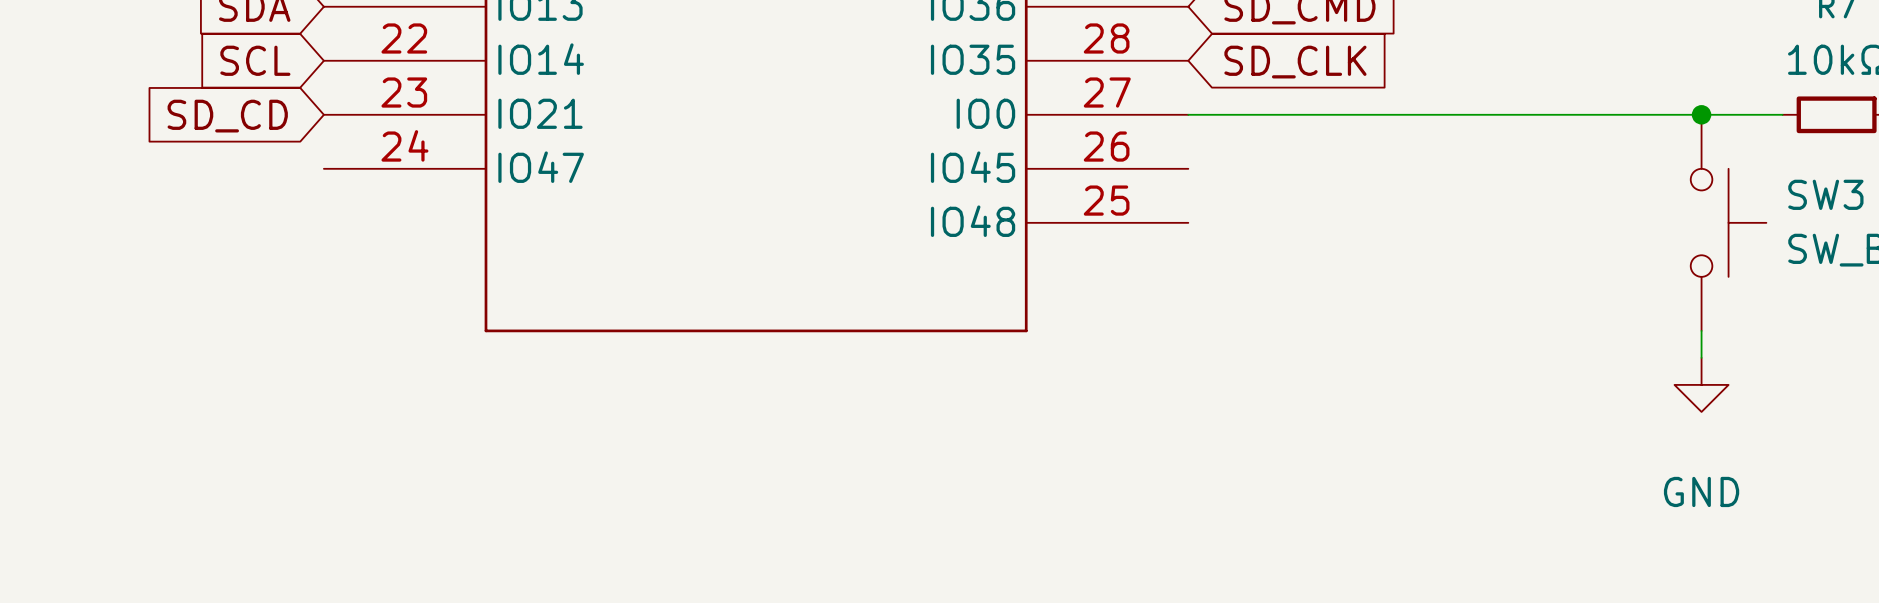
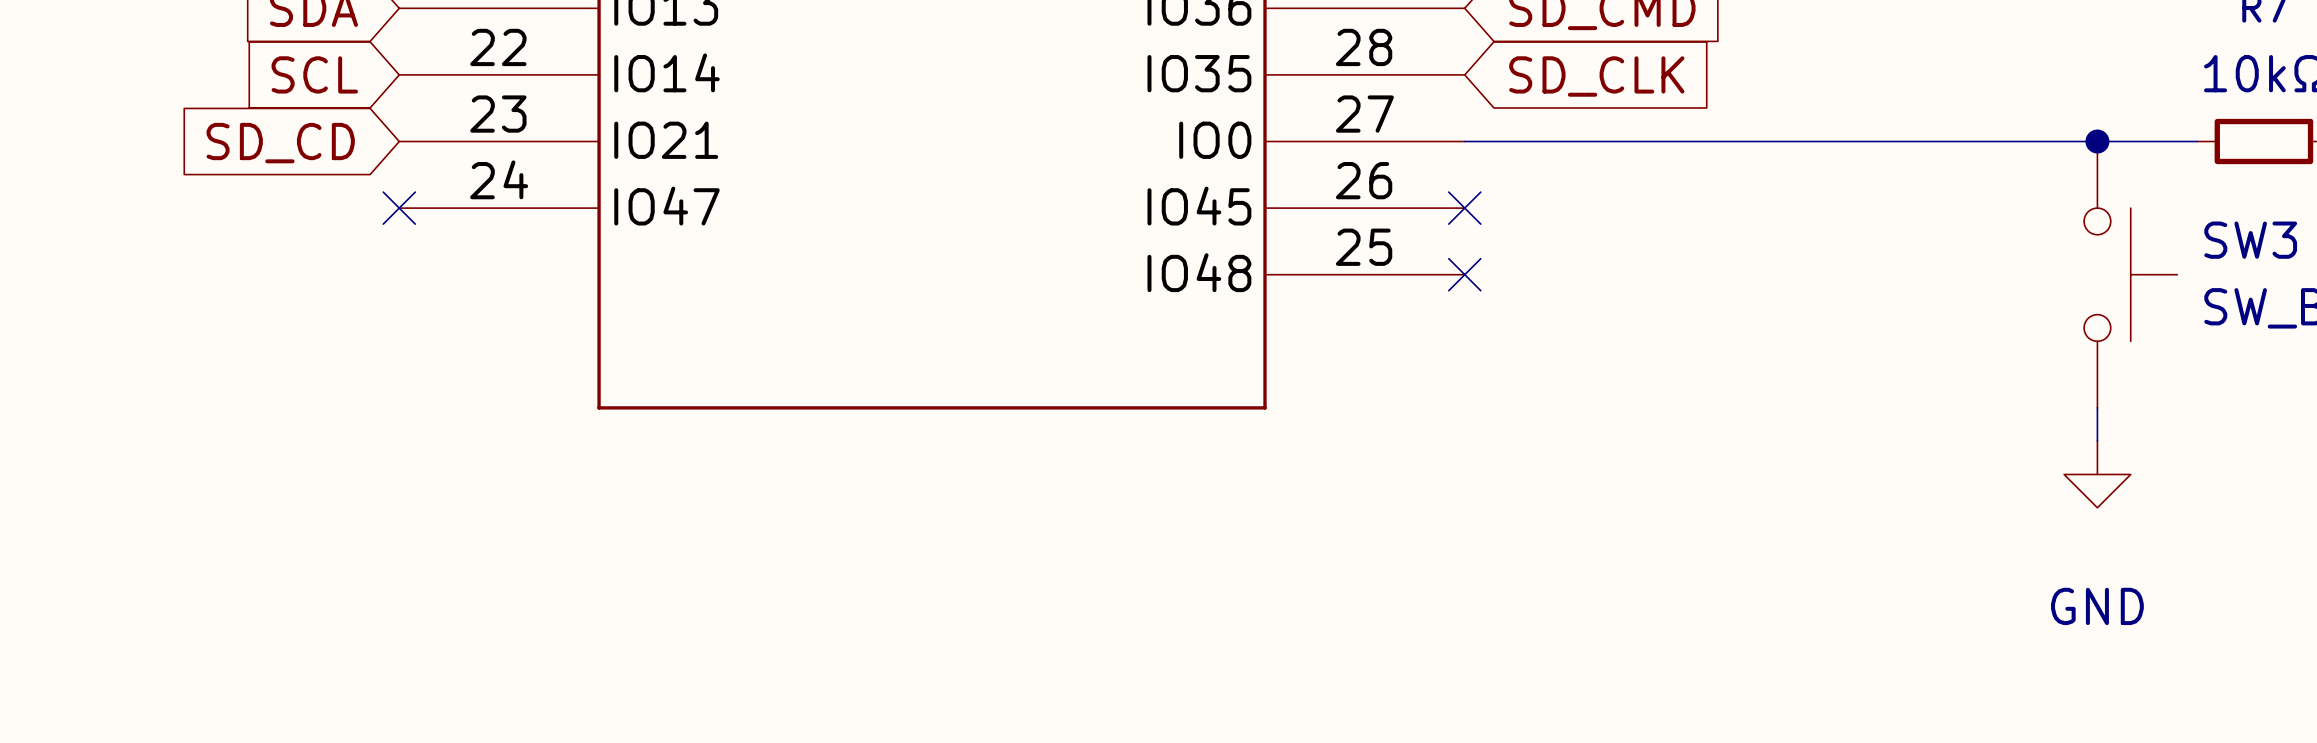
no-connect mark: none -> (399, 208)
no-connect mark: none -> (1464, 208)
no-connect mark: none -> (1464, 274)

